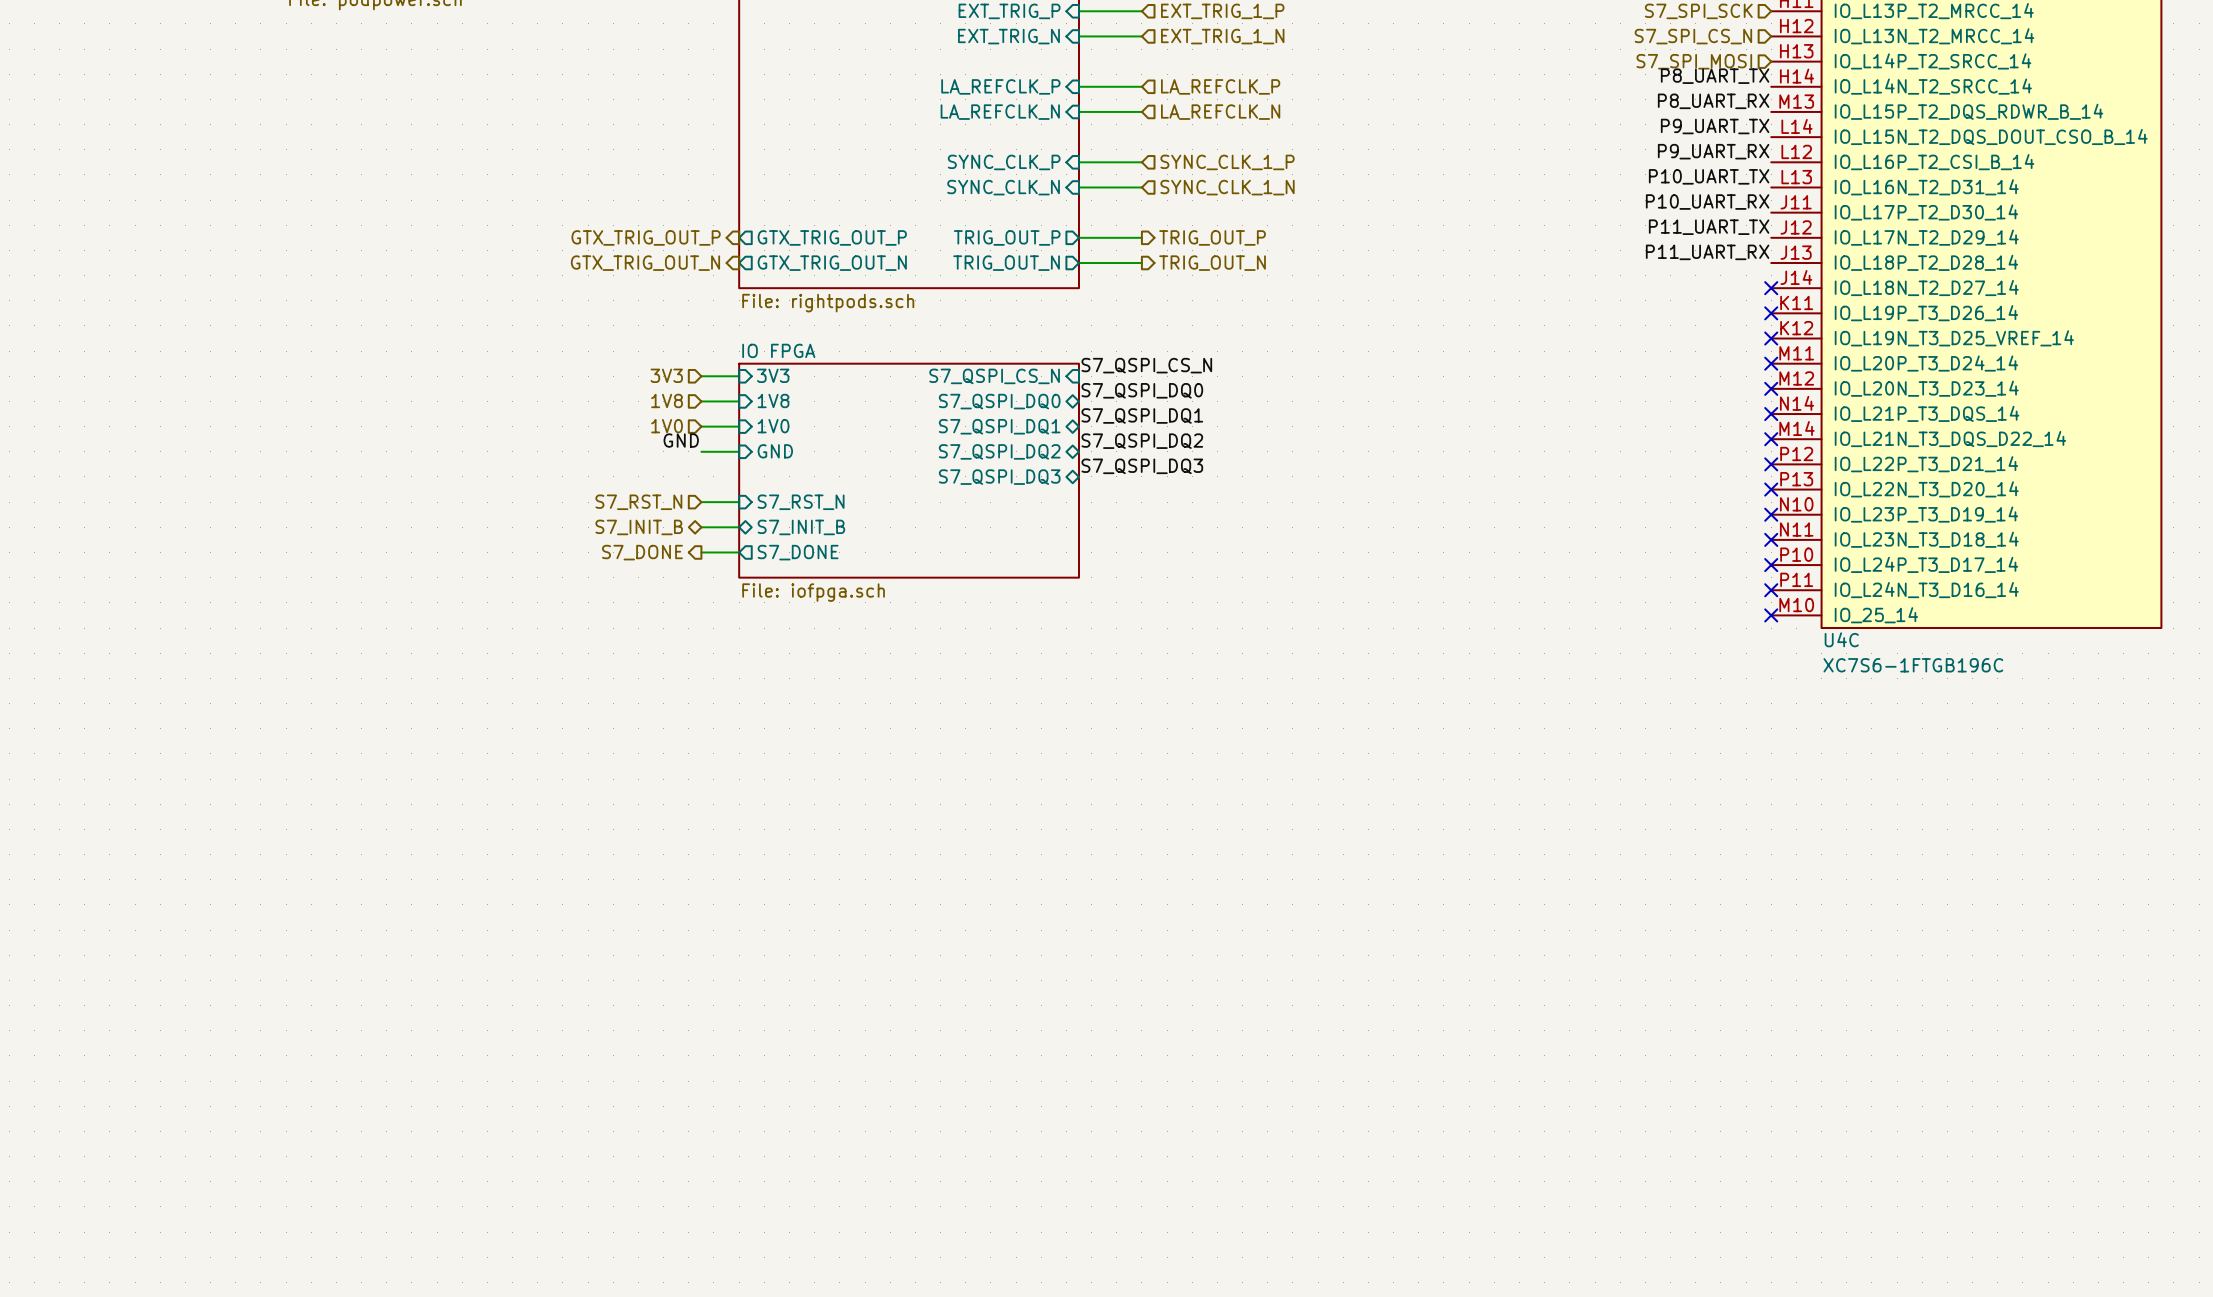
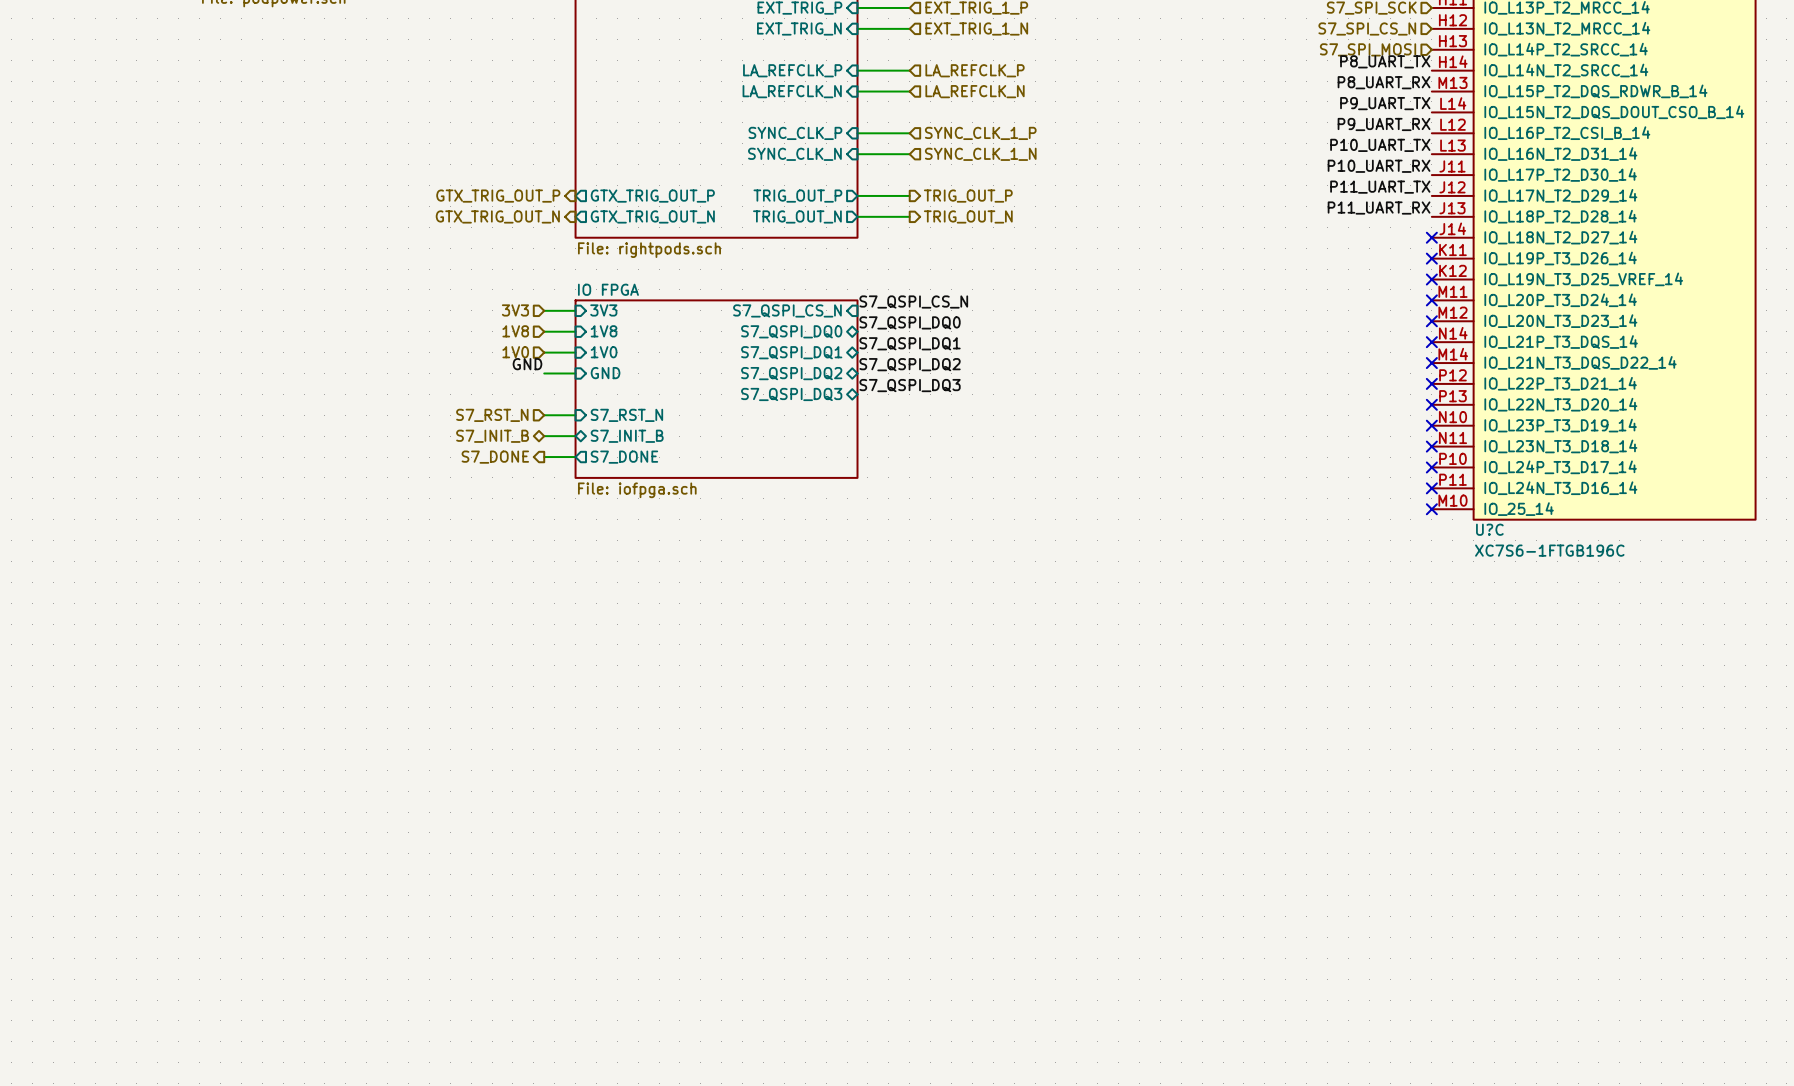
U4C name: U4C (1841, 639) -> U?C (1489, 529)

